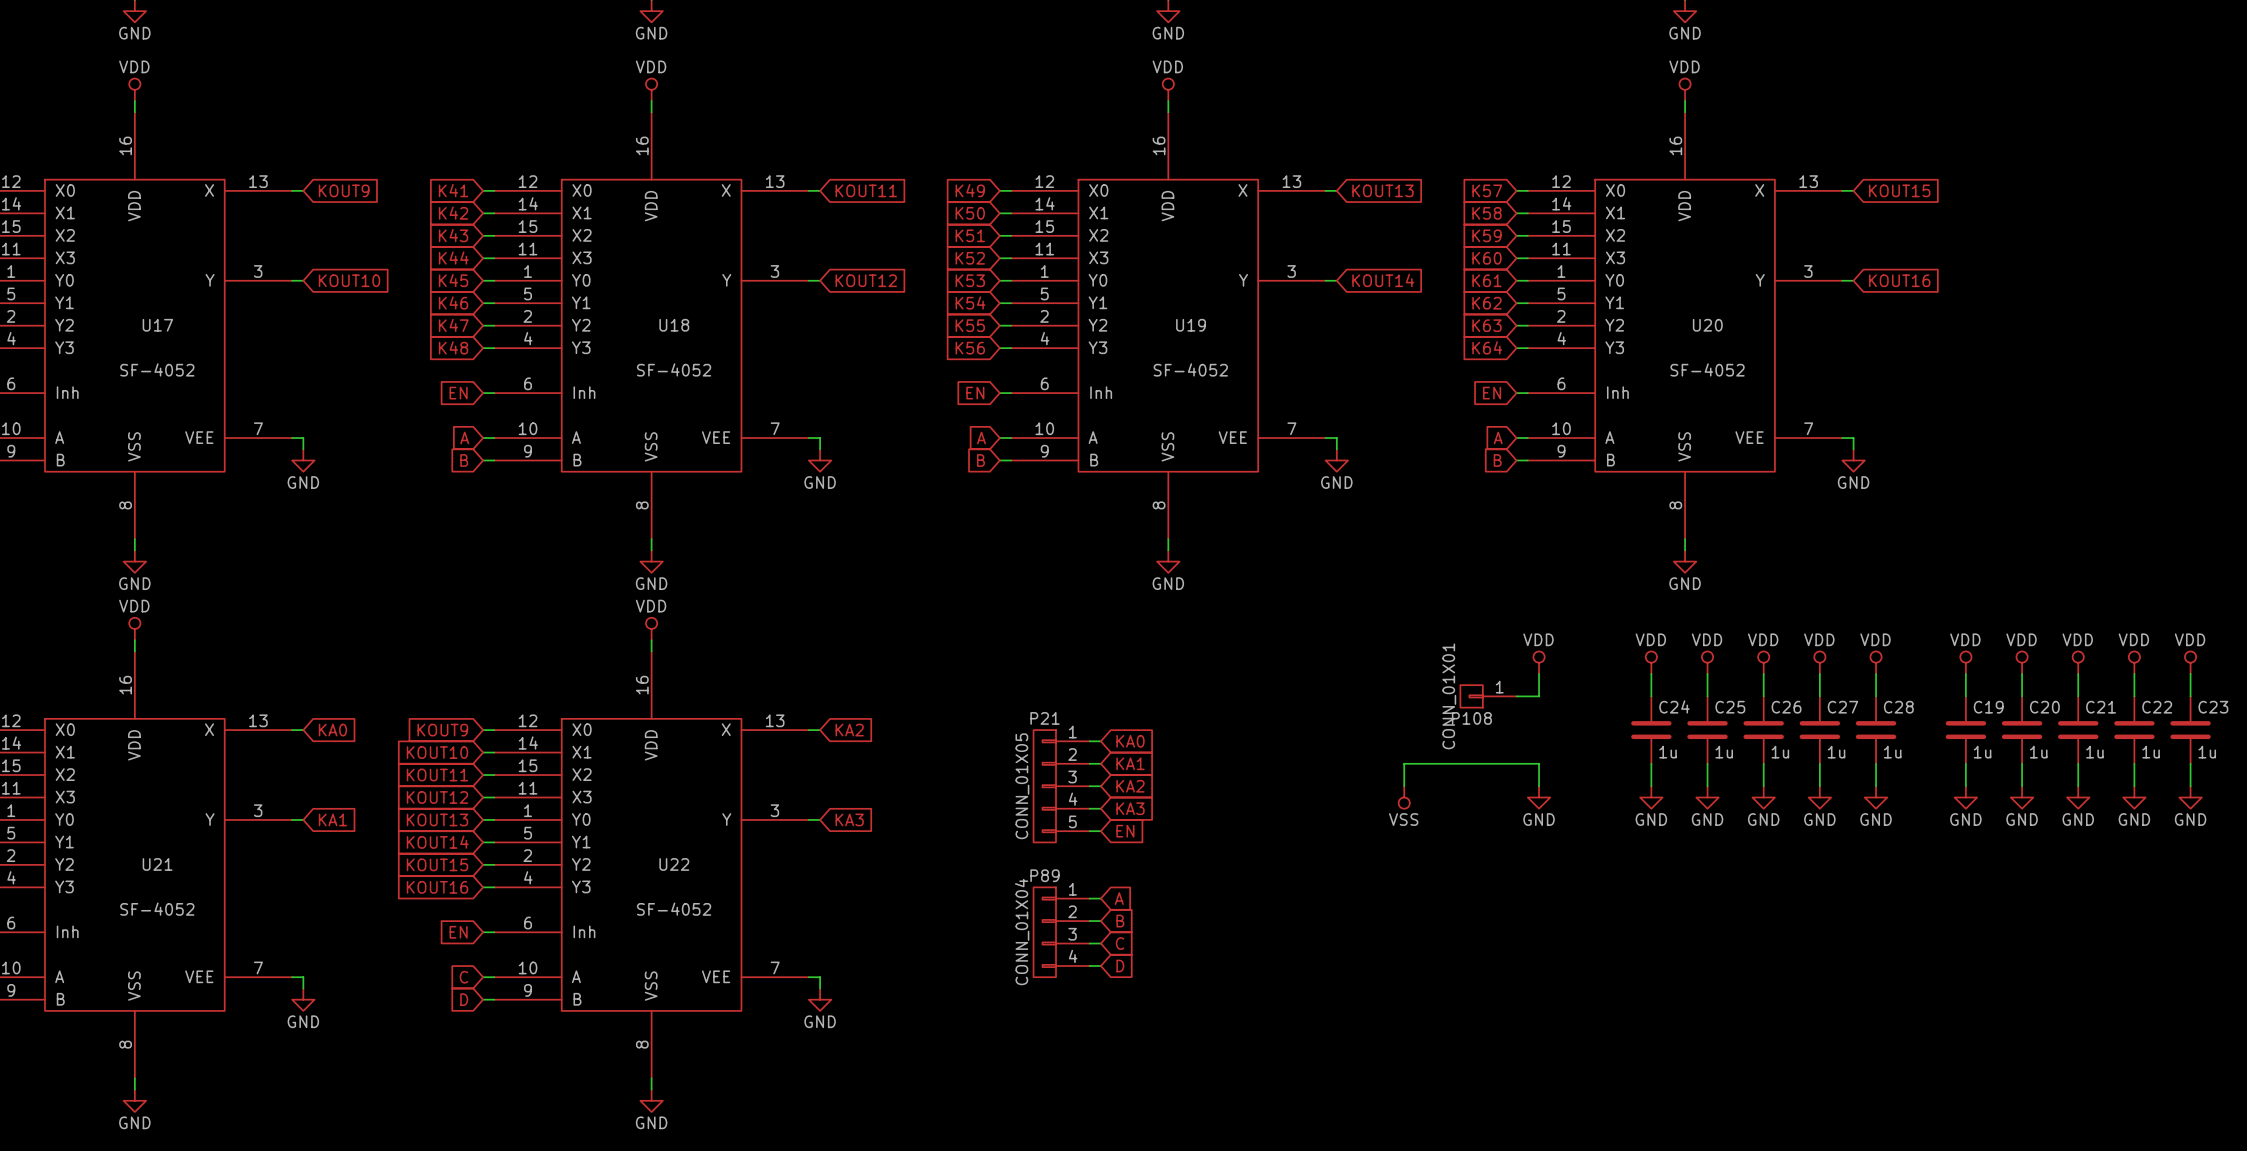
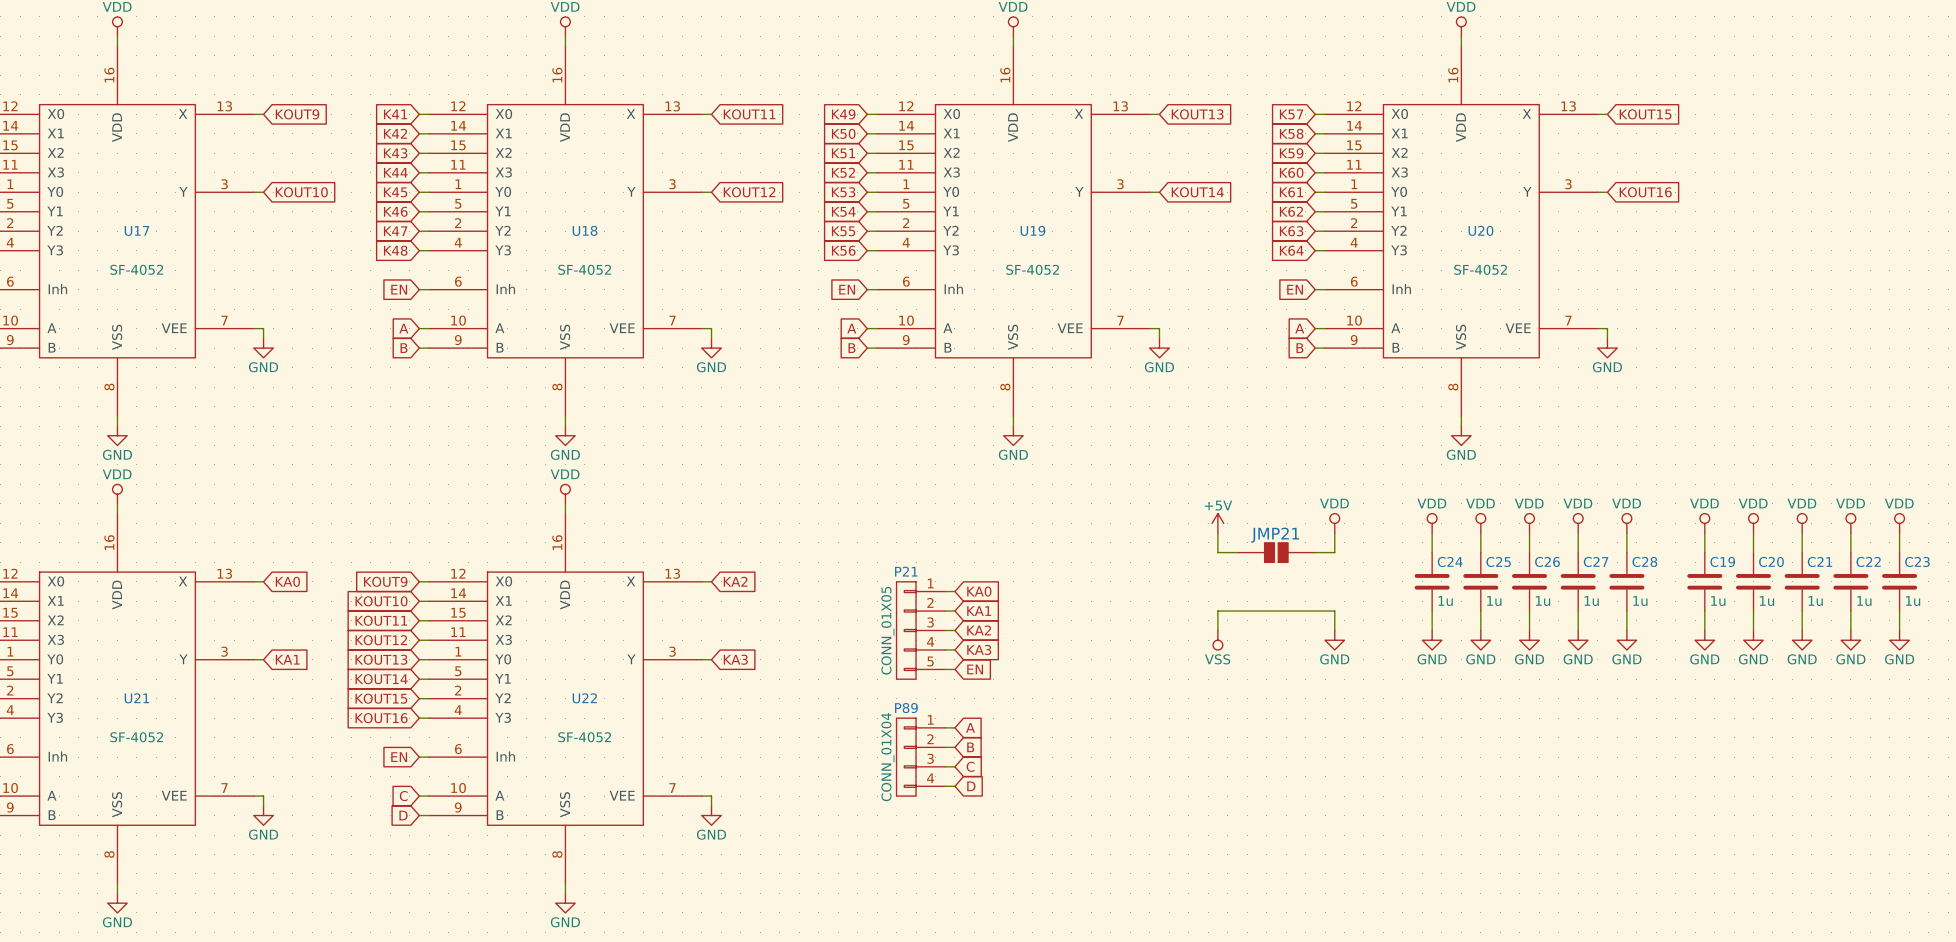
power symbol: none -> +5V (1217, 523)
wire: none -> (1217, 533) (1217, 552) (1237, 552)
JMP21: none -> (1276, 552)
P108: CONN_01X01 (1488, 696) -> none

